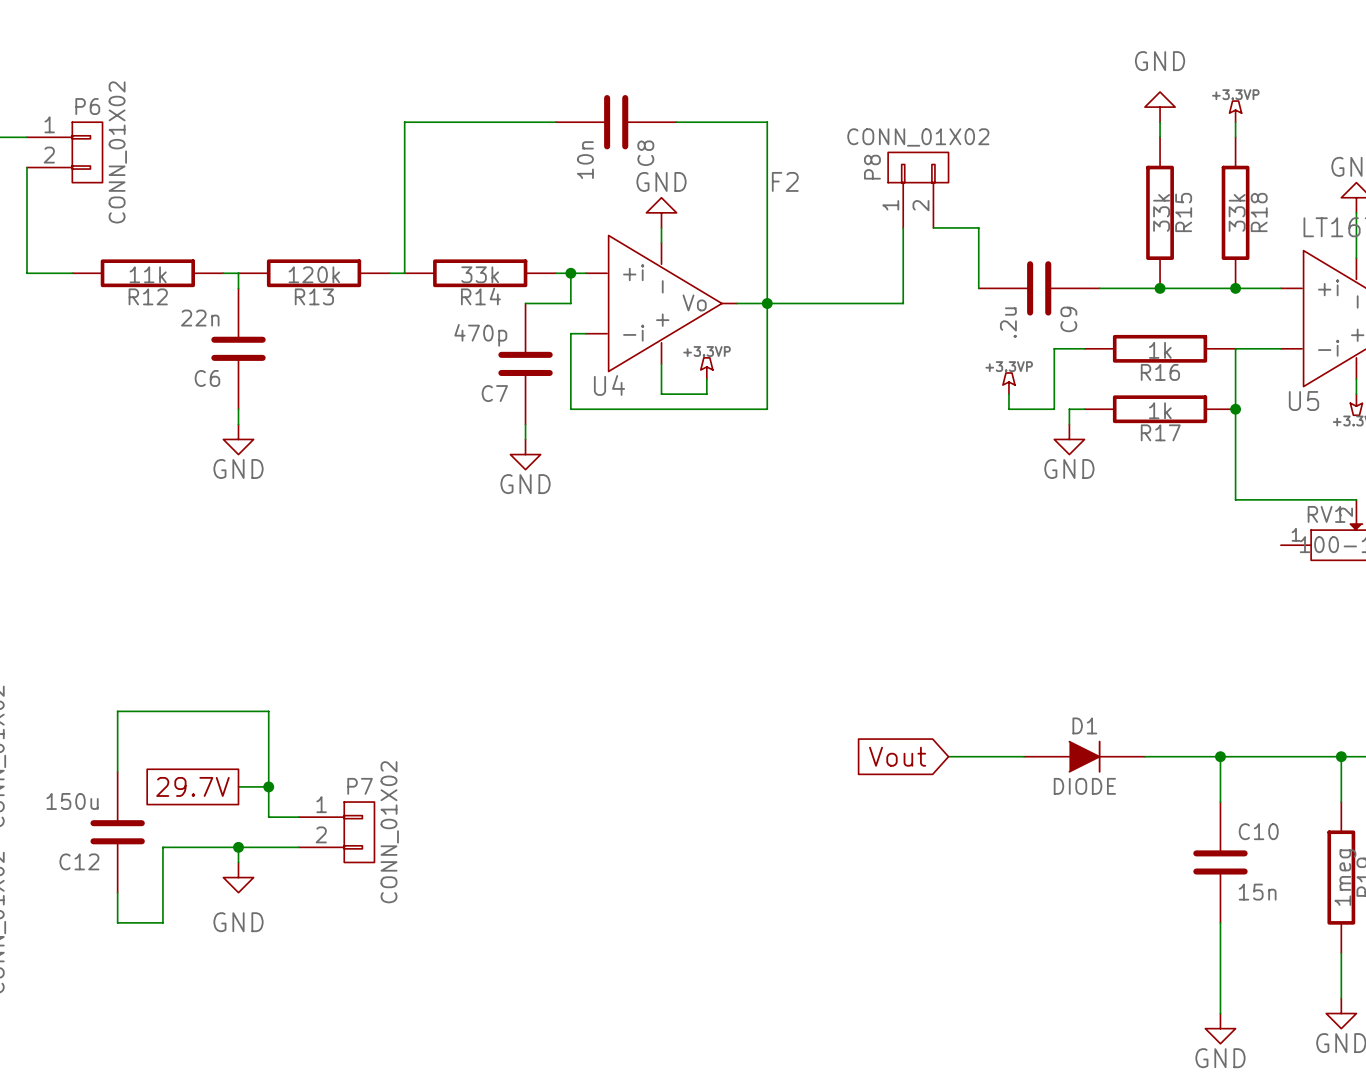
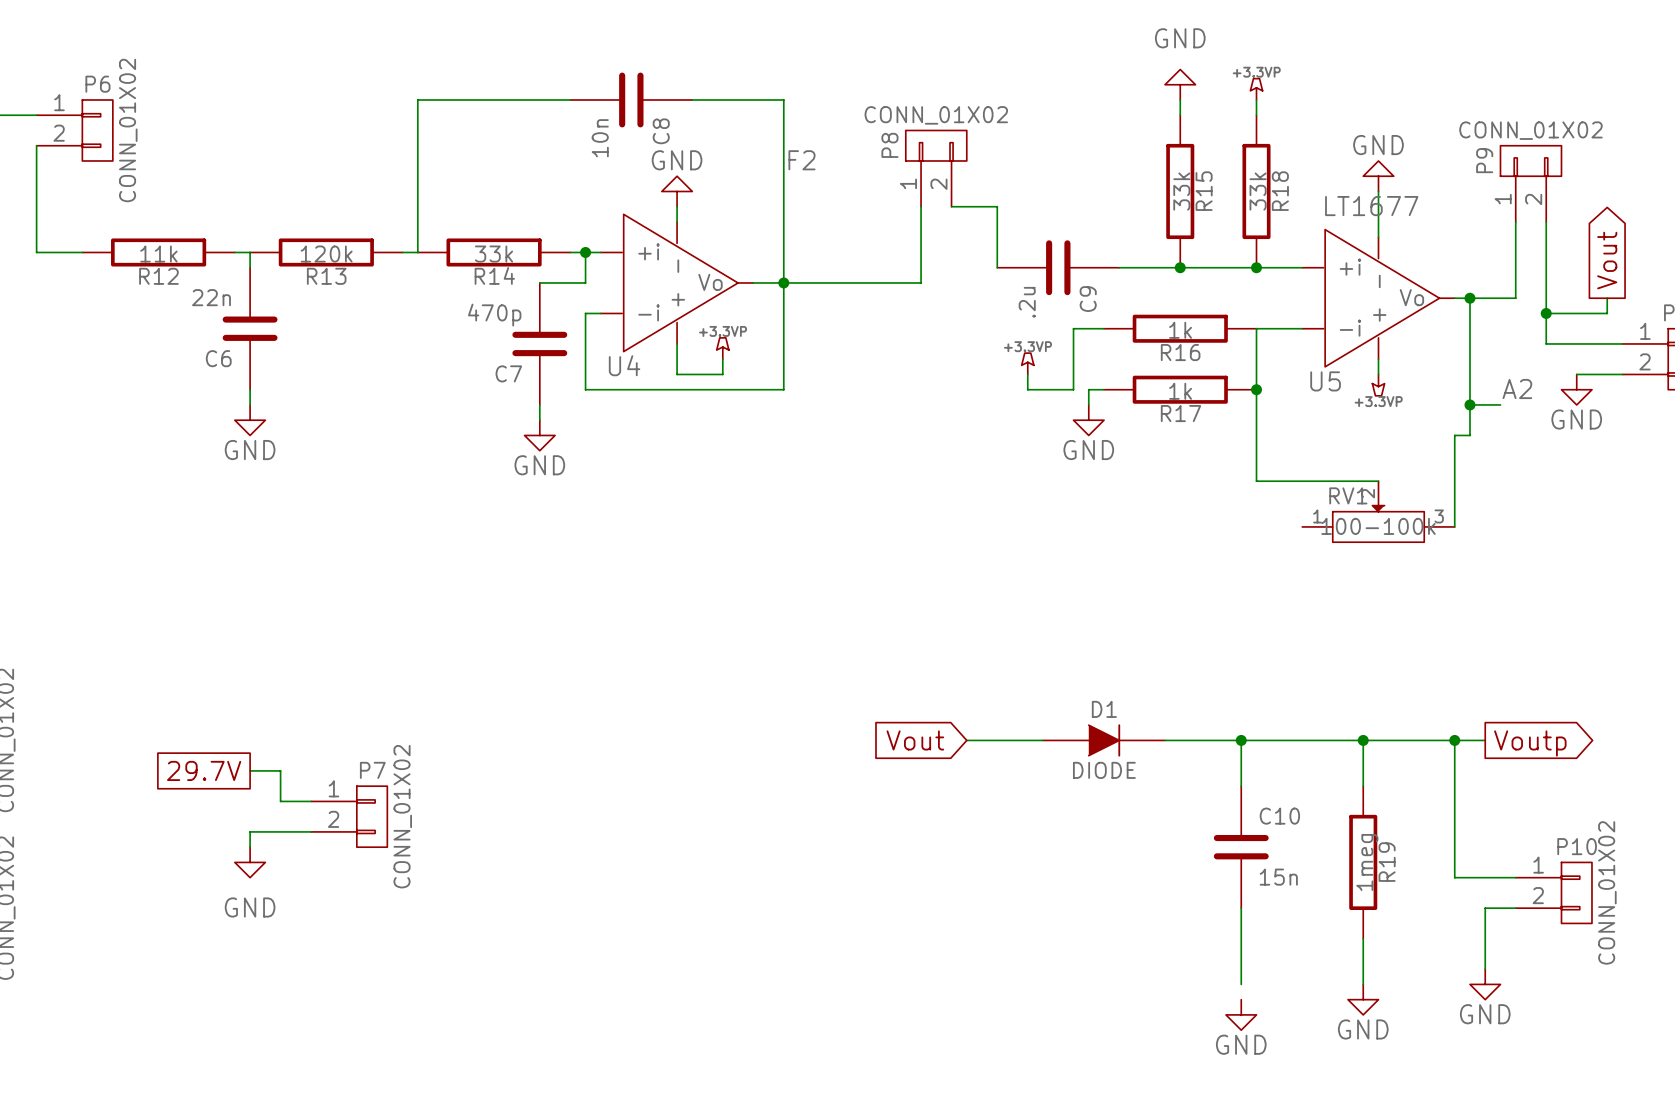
wire: (117, 771) (117, 711) (268, 711) (268, 786) -> none
junction: (268, 786) -> none
C12: 150u (117, 832) -> none
wire: (238, 847) (162, 847) (162, 922) (117, 922) (117, 892) -> none
junction: (238, 847) -> none
wire: (1220, 998) (1220, 1013) -> none

